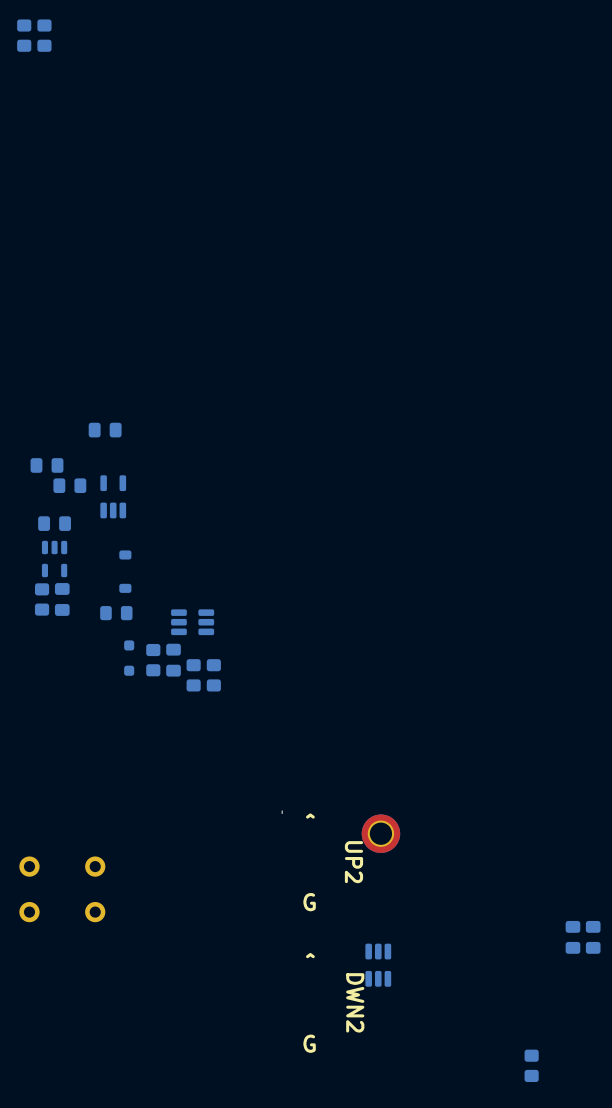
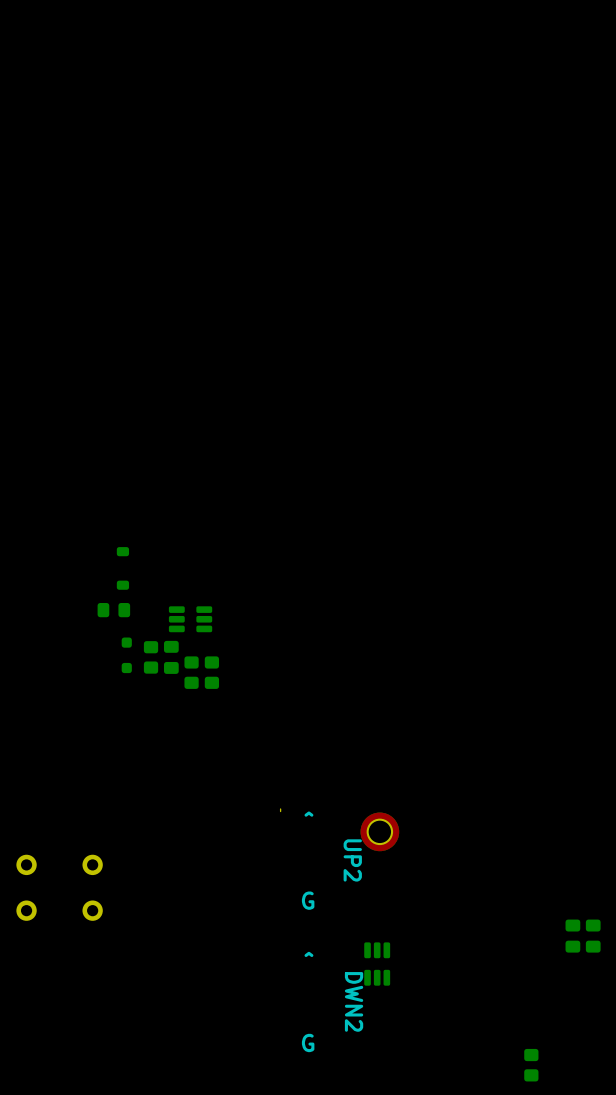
part: (24, 35) -> none
part: (44, 35) -> none
part: (105, 430) -> none
part: (46, 465) -> none
part: (69, 485) -> none
part: (113, 496) -> none
part: (54, 523) -> none
part: (54, 559) -> none
part: (42, 599) -> none
part: (62, 599) -> none

